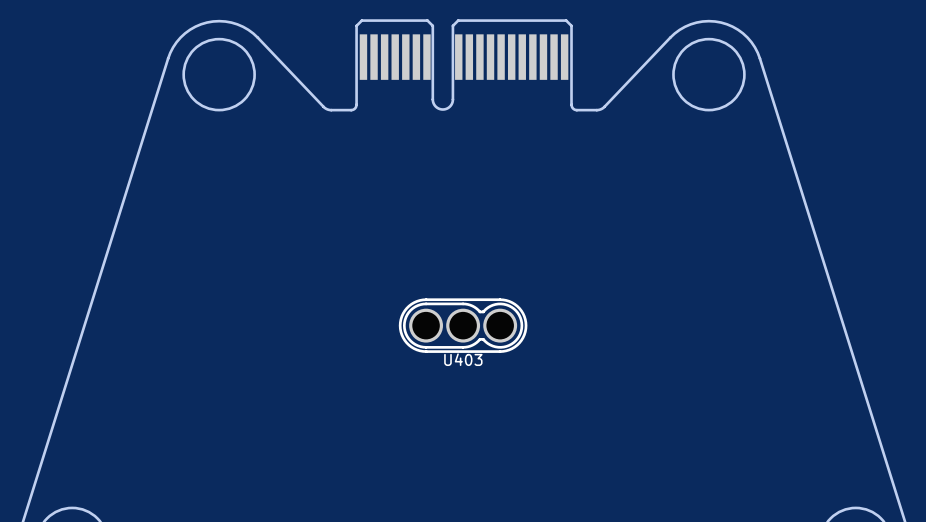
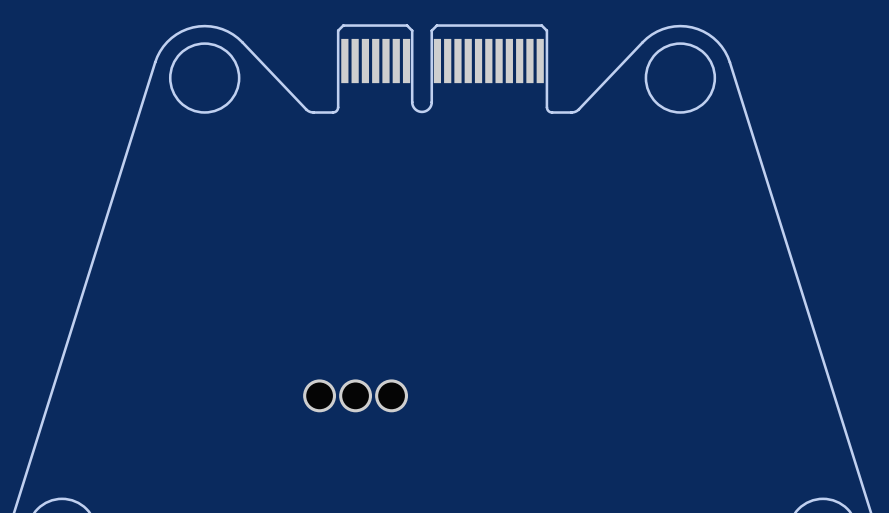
U403 side: bottom (463, 325) -> top (355, 395)

